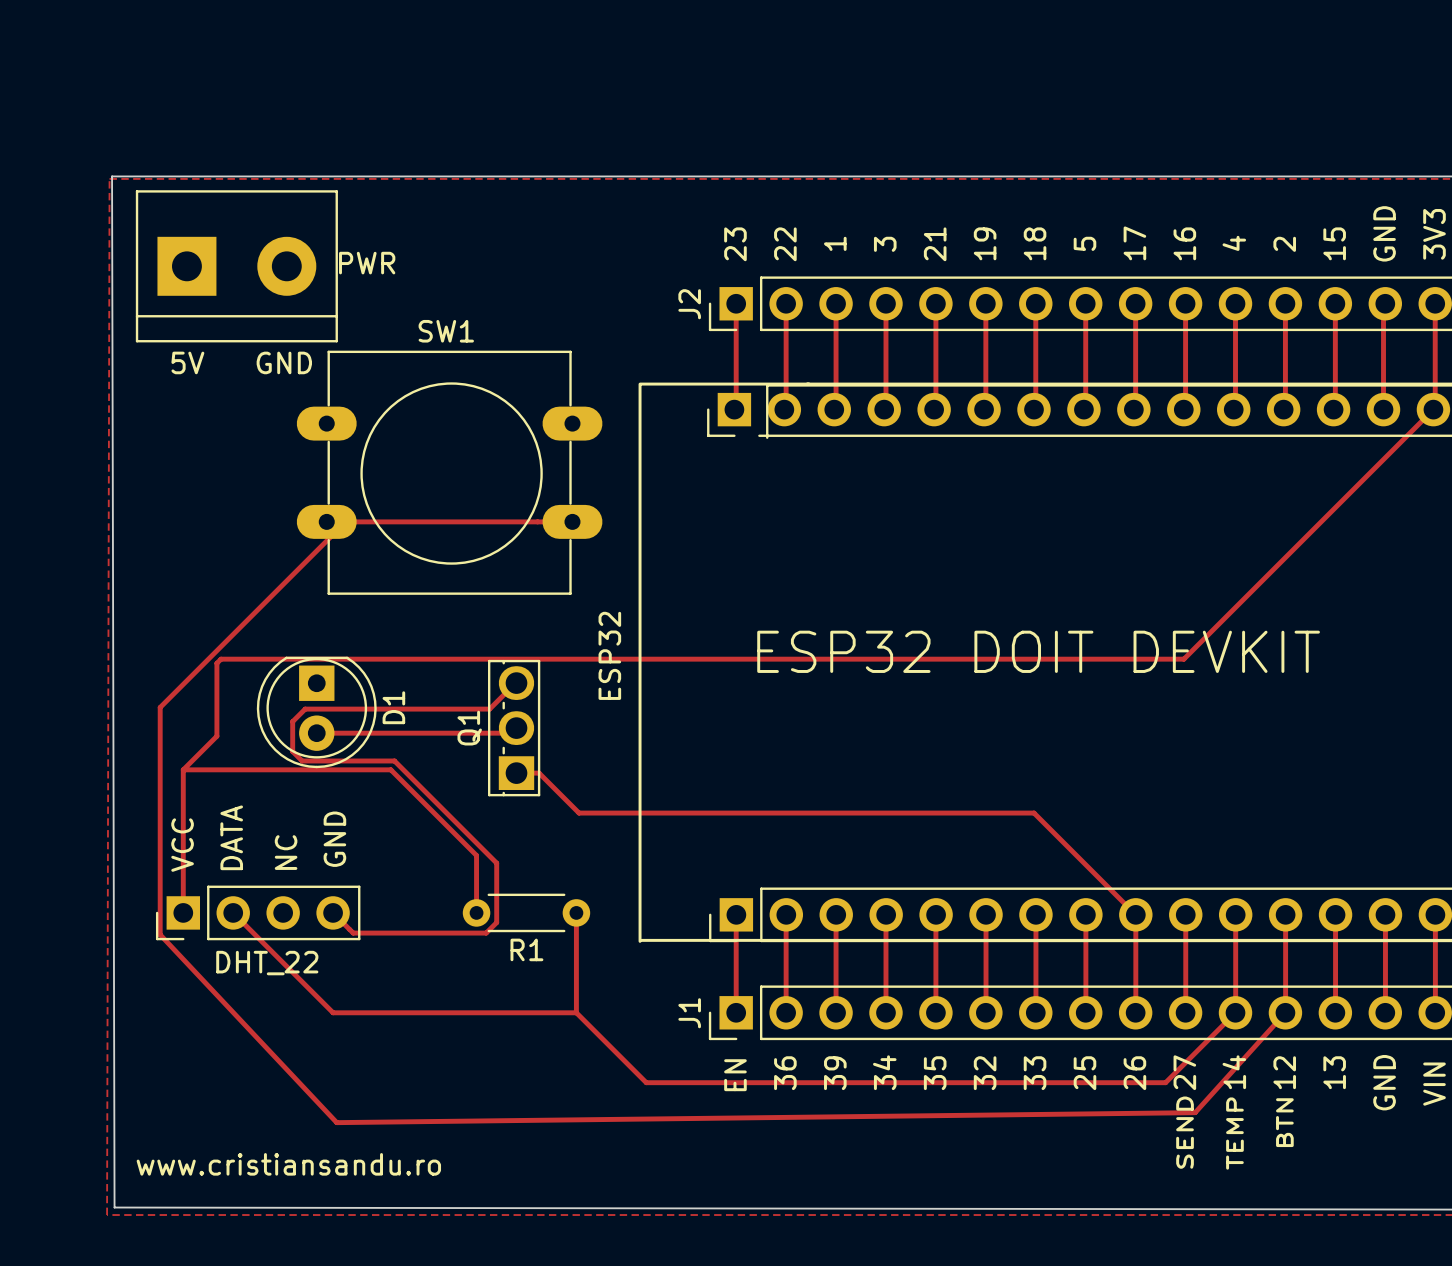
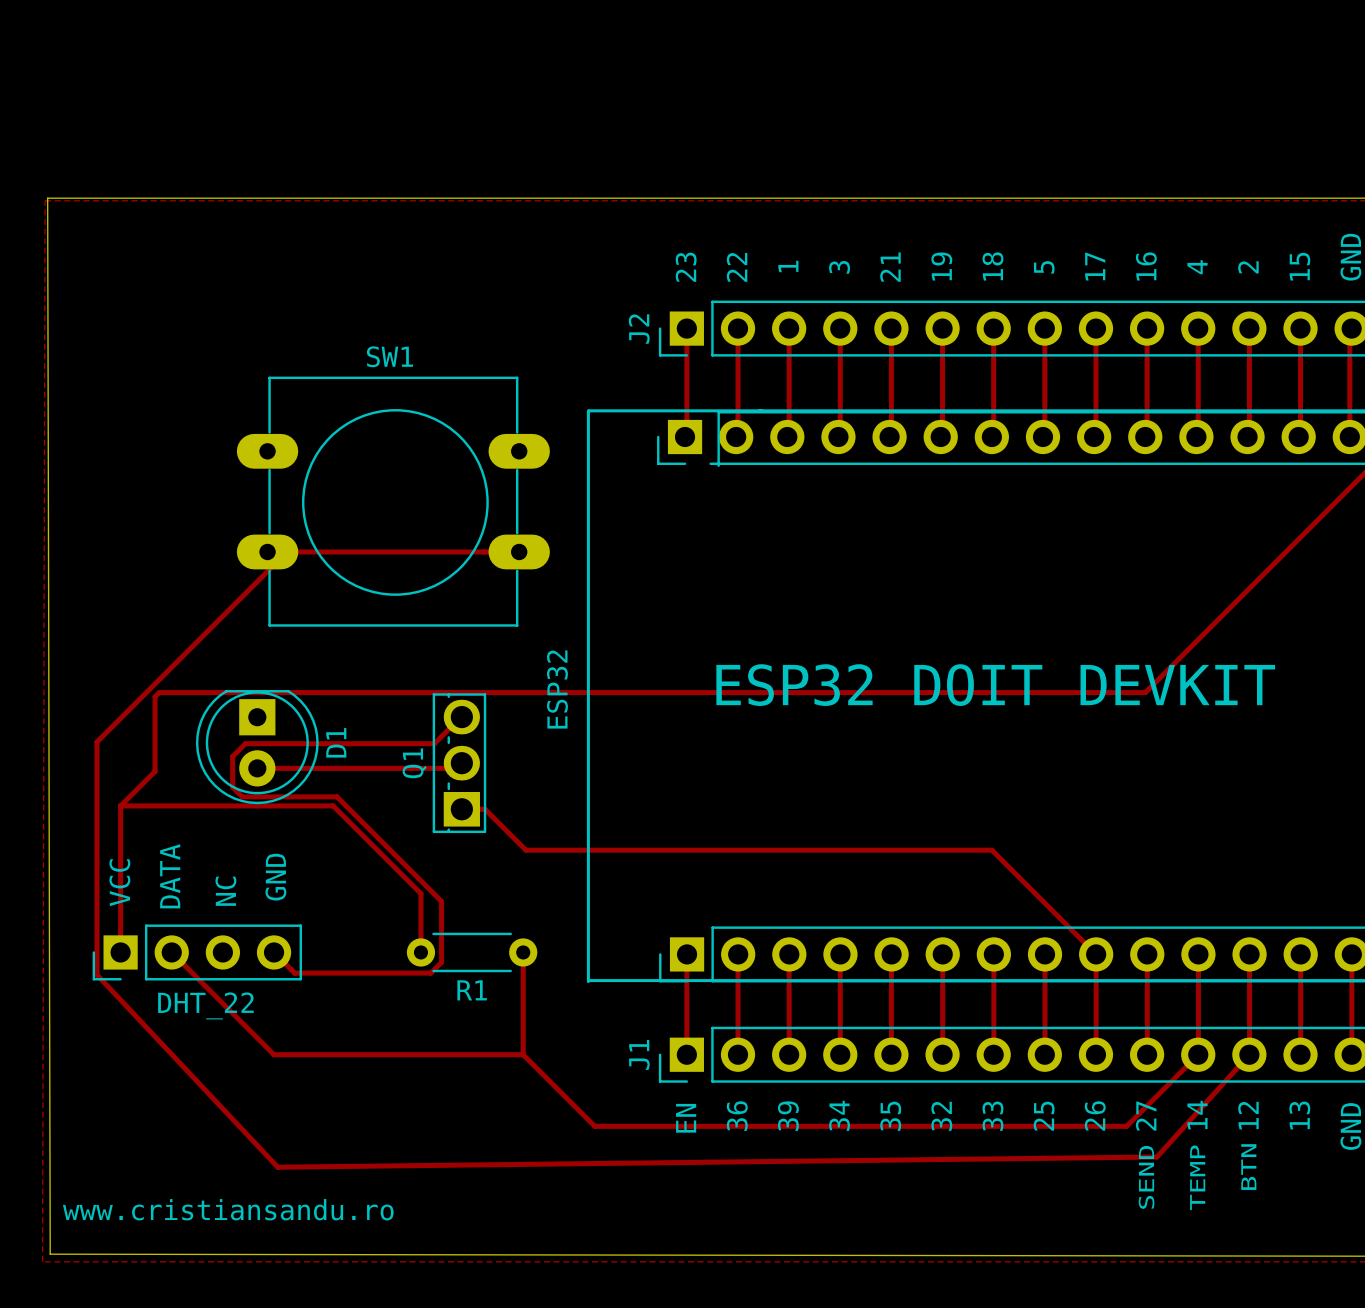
PWR: (236, 266) -> none
text: 5V (187, 362) -> none
text: GND (284, 362) -> none

